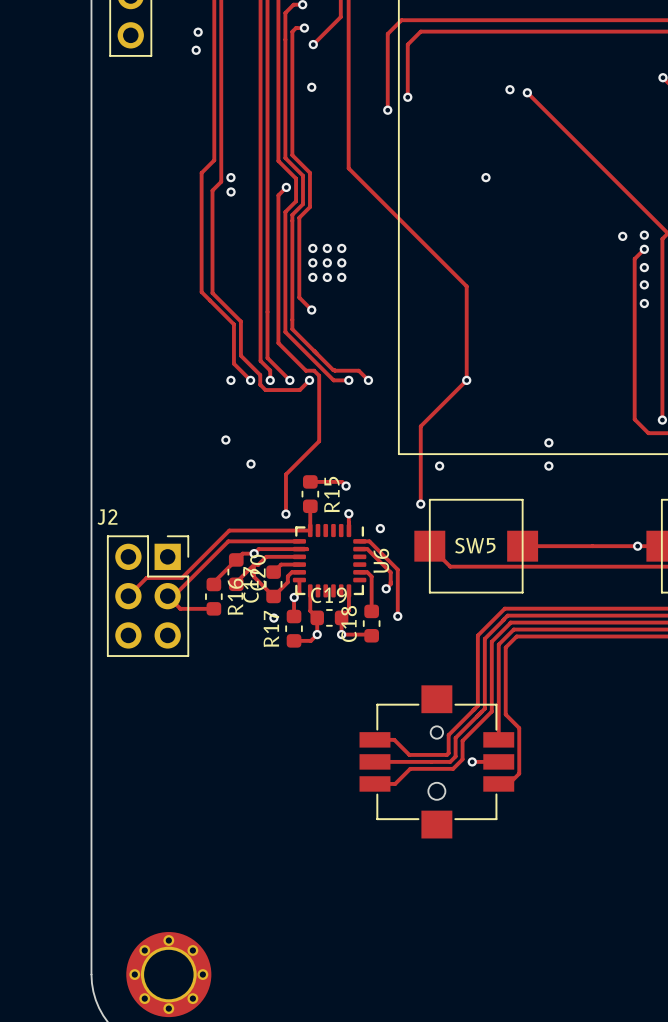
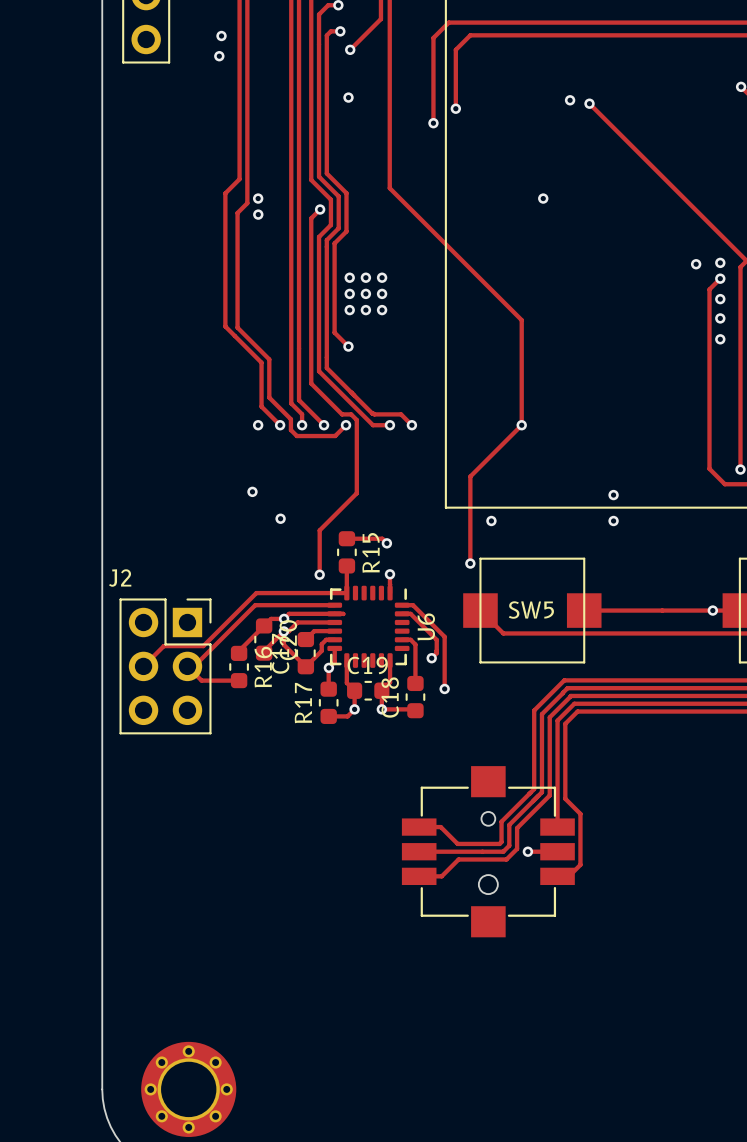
via: (380, 528) -> none
via position: (273, 618) -> (283, 631)

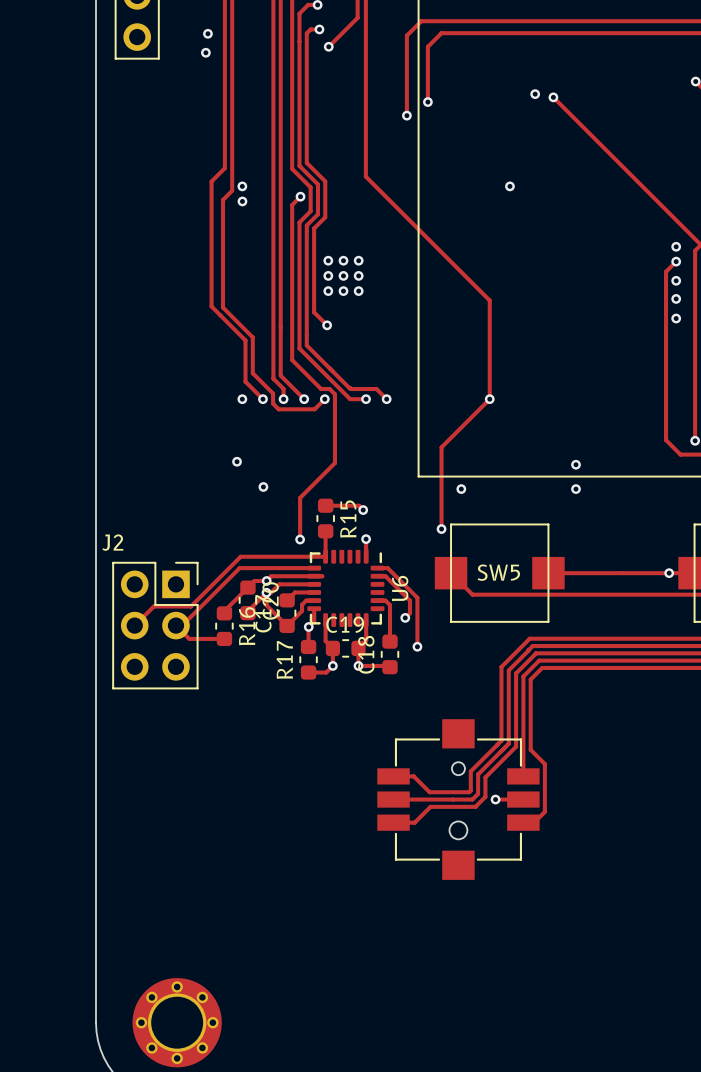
via: (348, 97) -> none
via: (696, 264) -> none

